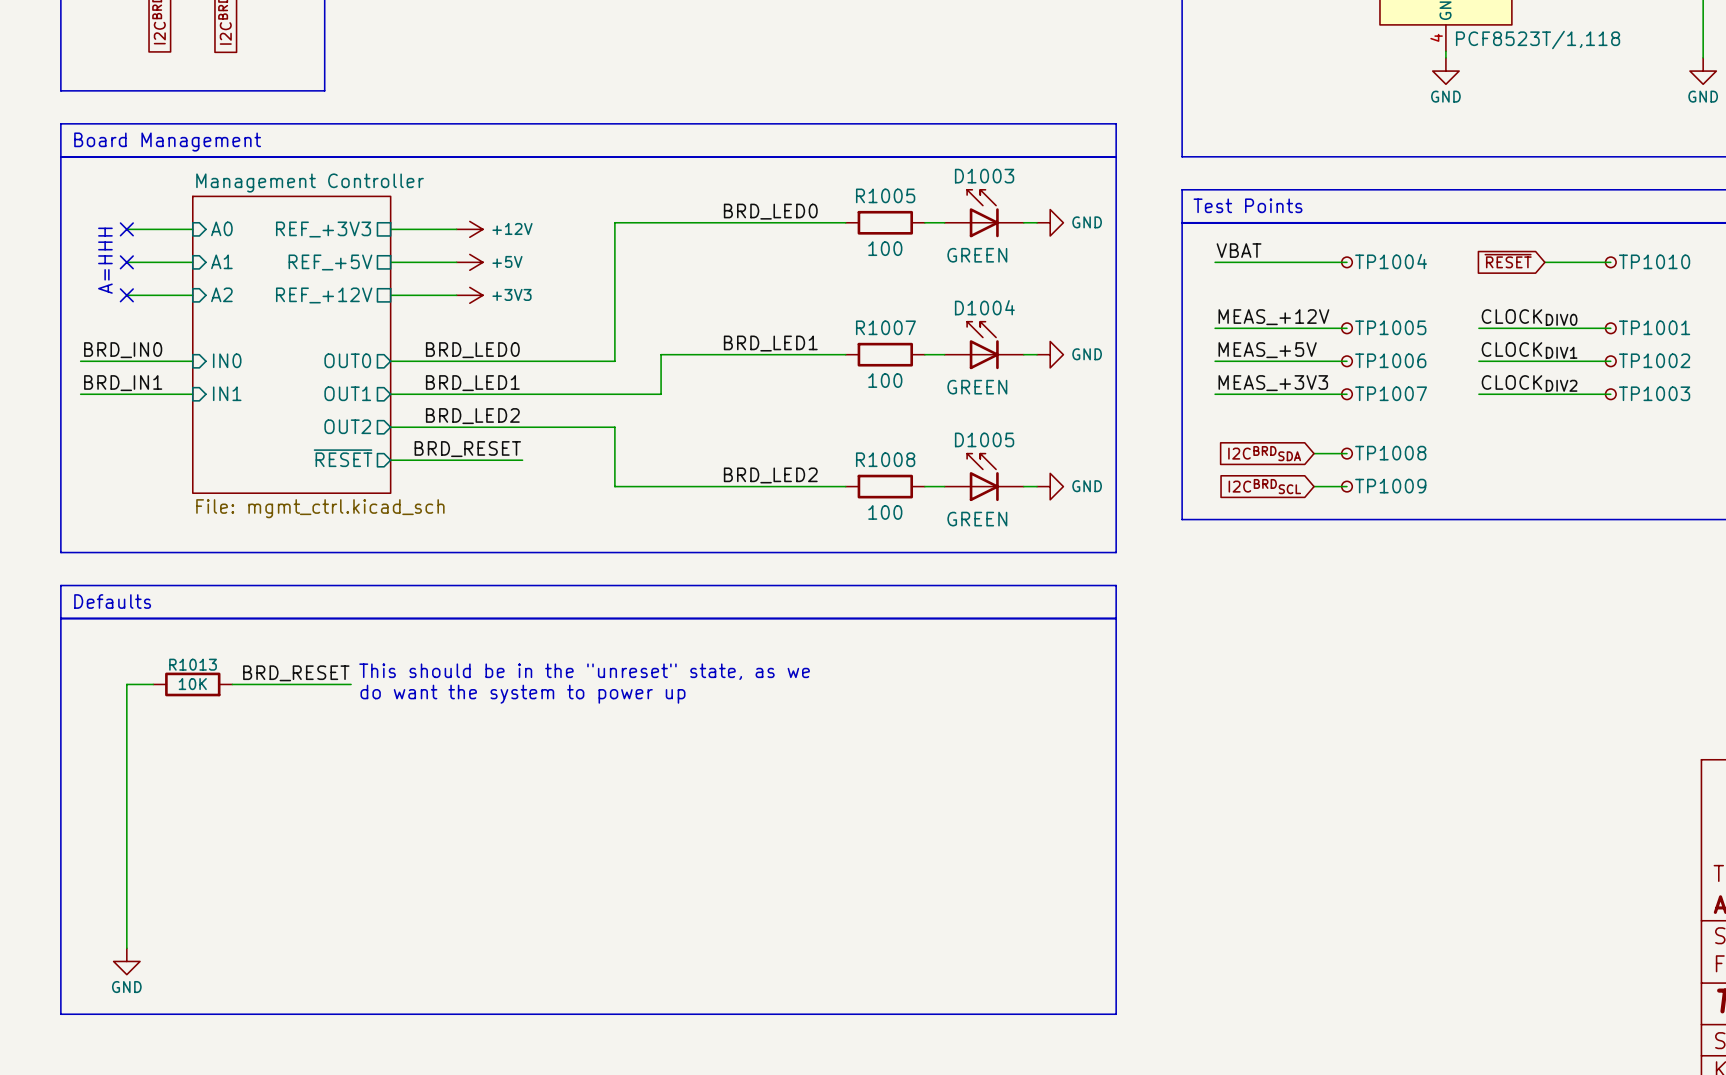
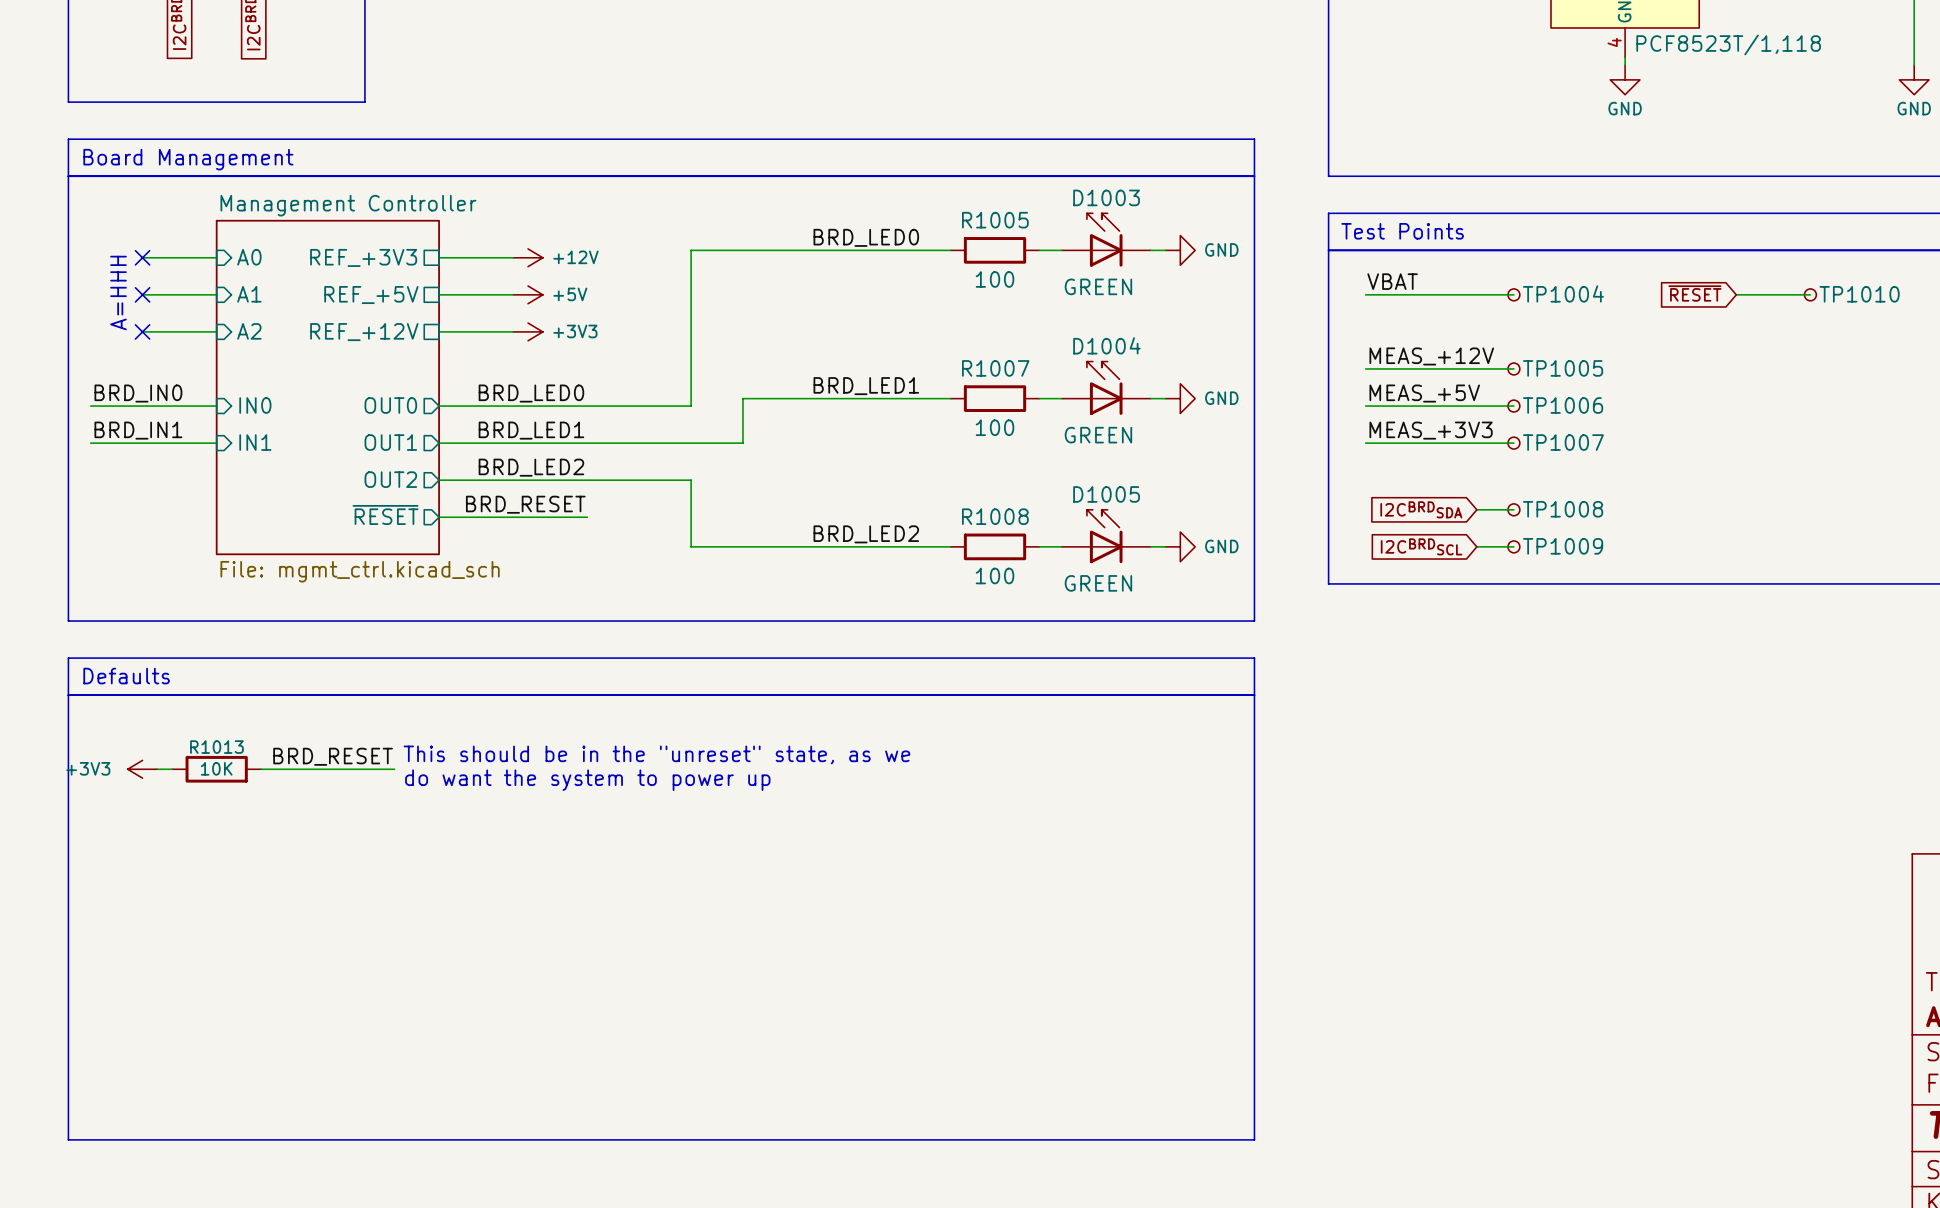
label: CLOCKDIV0 (1529, 317) -> none
wire: (1478, 328) (1610, 328) -> none
TP1001: (1610, 328) -> none
label: CLOCKDIV1 (1529, 350) -> none
wire: (1478, 361) (1610, 361) -> none
TP1002: (1610, 361) -> none
label: CLOCKDIV2 (1529, 383) -> none
wire: (1478, 394) (1610, 394) -> none
TP1003: (1610, 394) -> none
power symbol: none -> +3V3 (142, 769)
wire: (140, 684) (126, 684) (126, 948) -> none
power symbol: GND (126, 961) -> none

